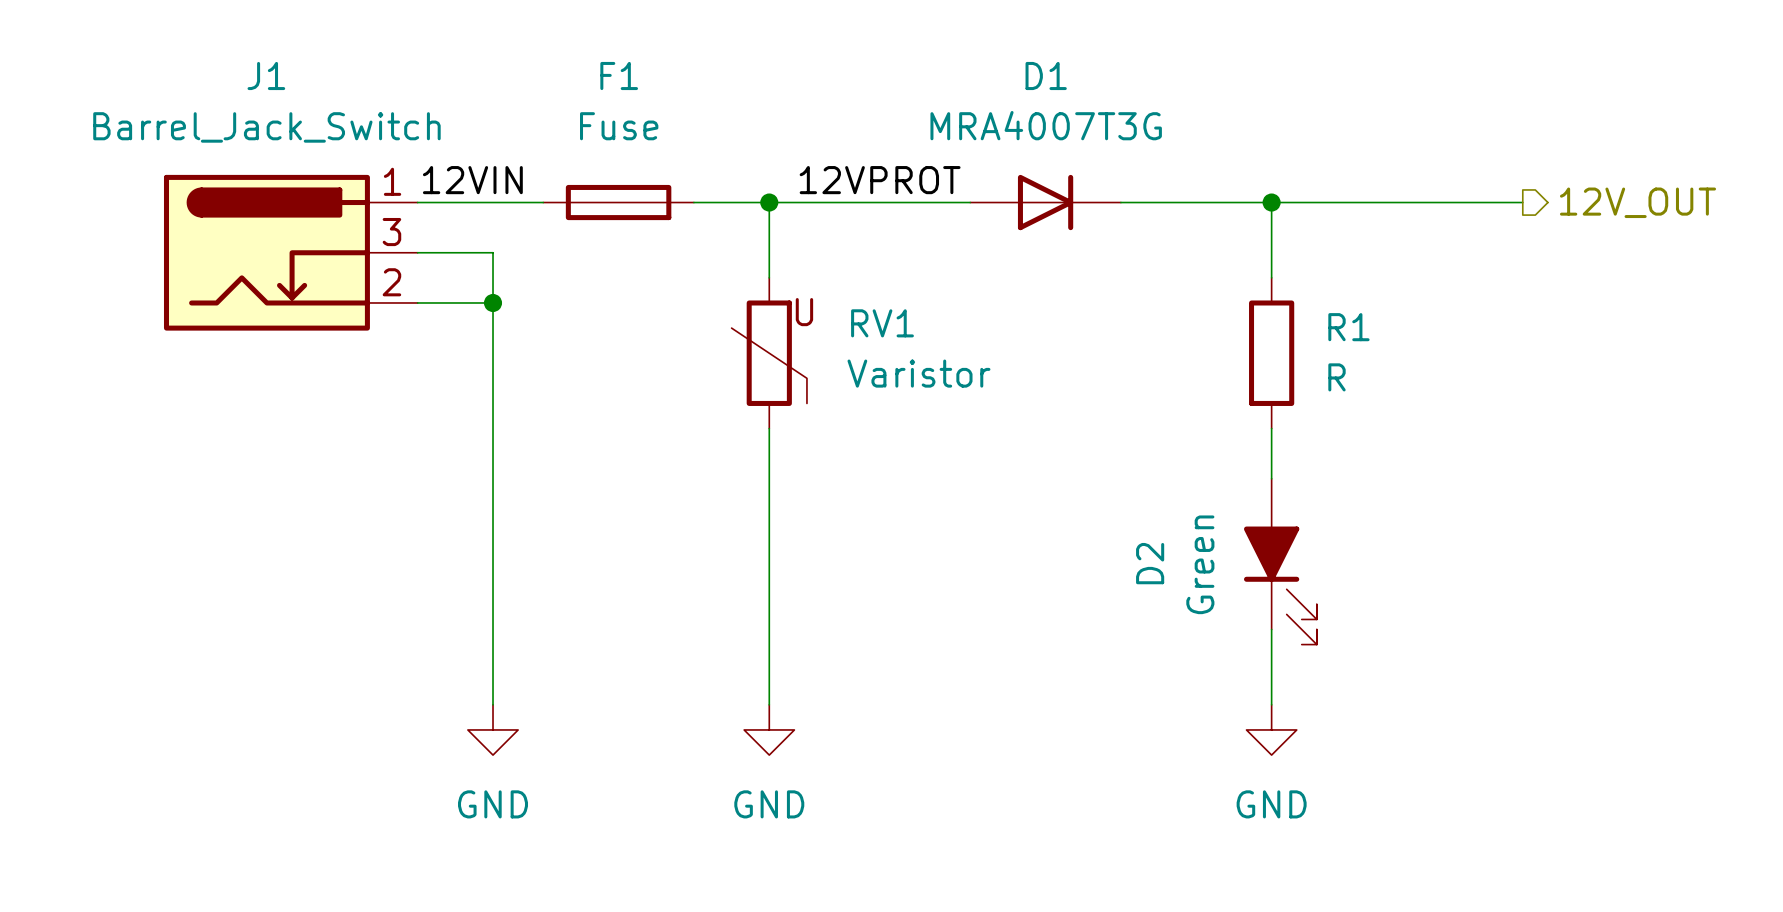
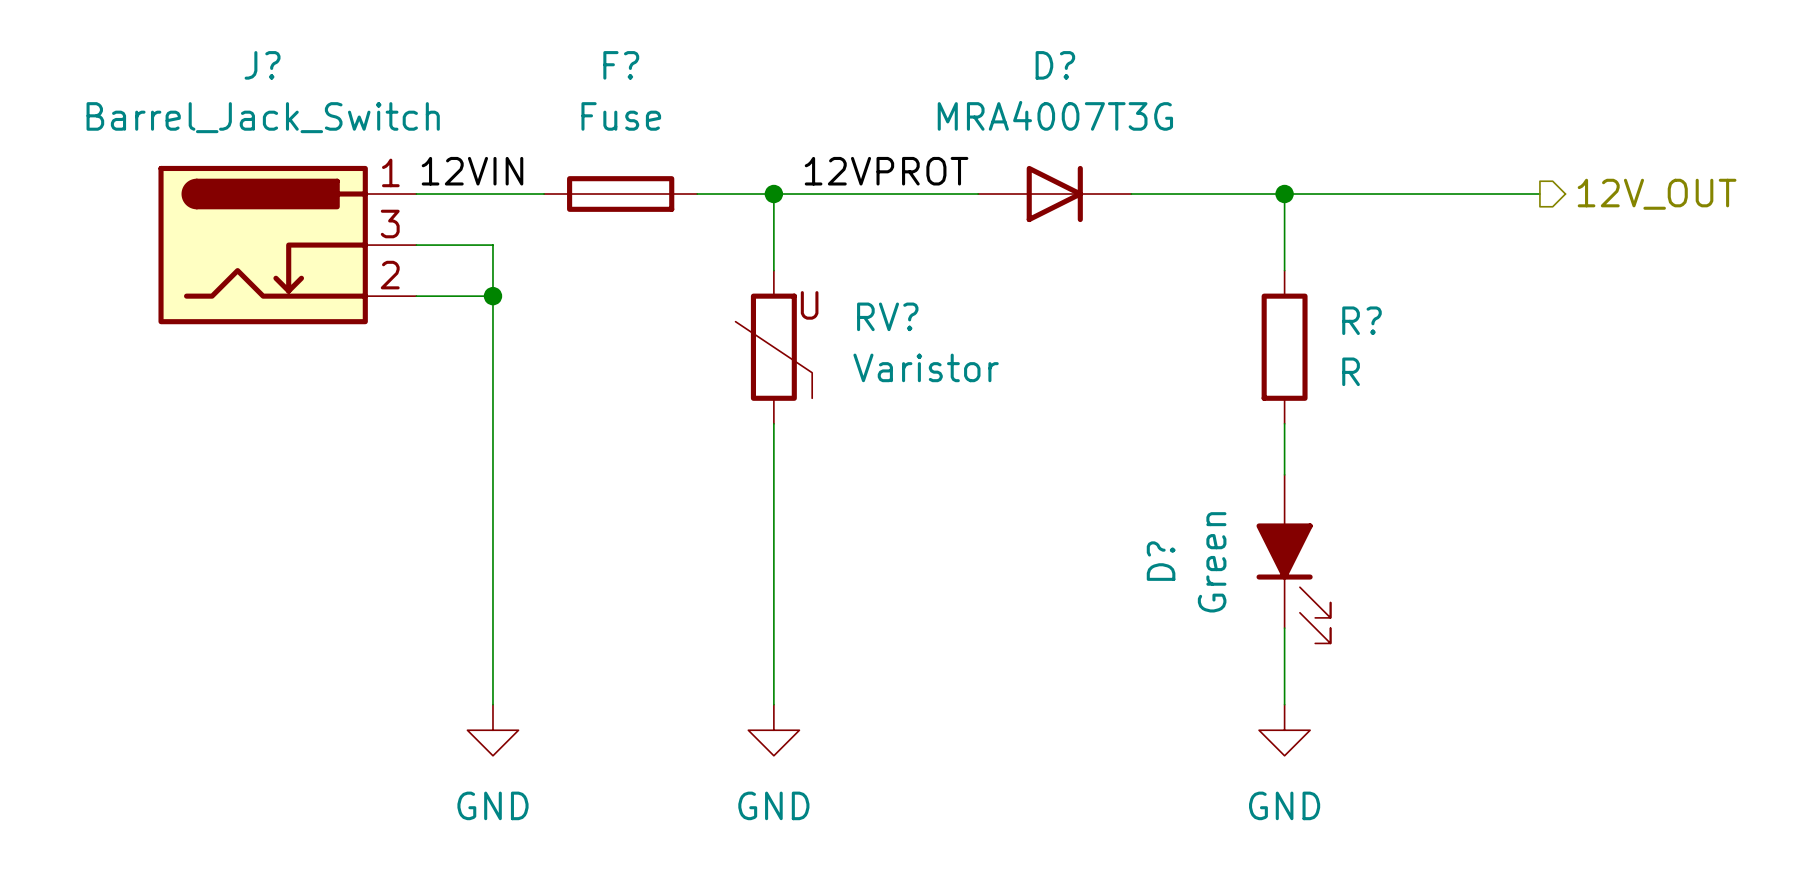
J1 name: J1 (266, 76) -> J? (262, 65)
F1 name: F1 (619, 76) -> F? (621, 65)
D1 name: D1 (1046, 76) -> D? (1055, 65)
RV1 name: RV1 (882, 323) -> RV? (887, 316)
R1 name: R1 (1348, 327) -> R? (1362, 320)
D2 name: D2 (1150, 563) -> D? (1161, 561)

